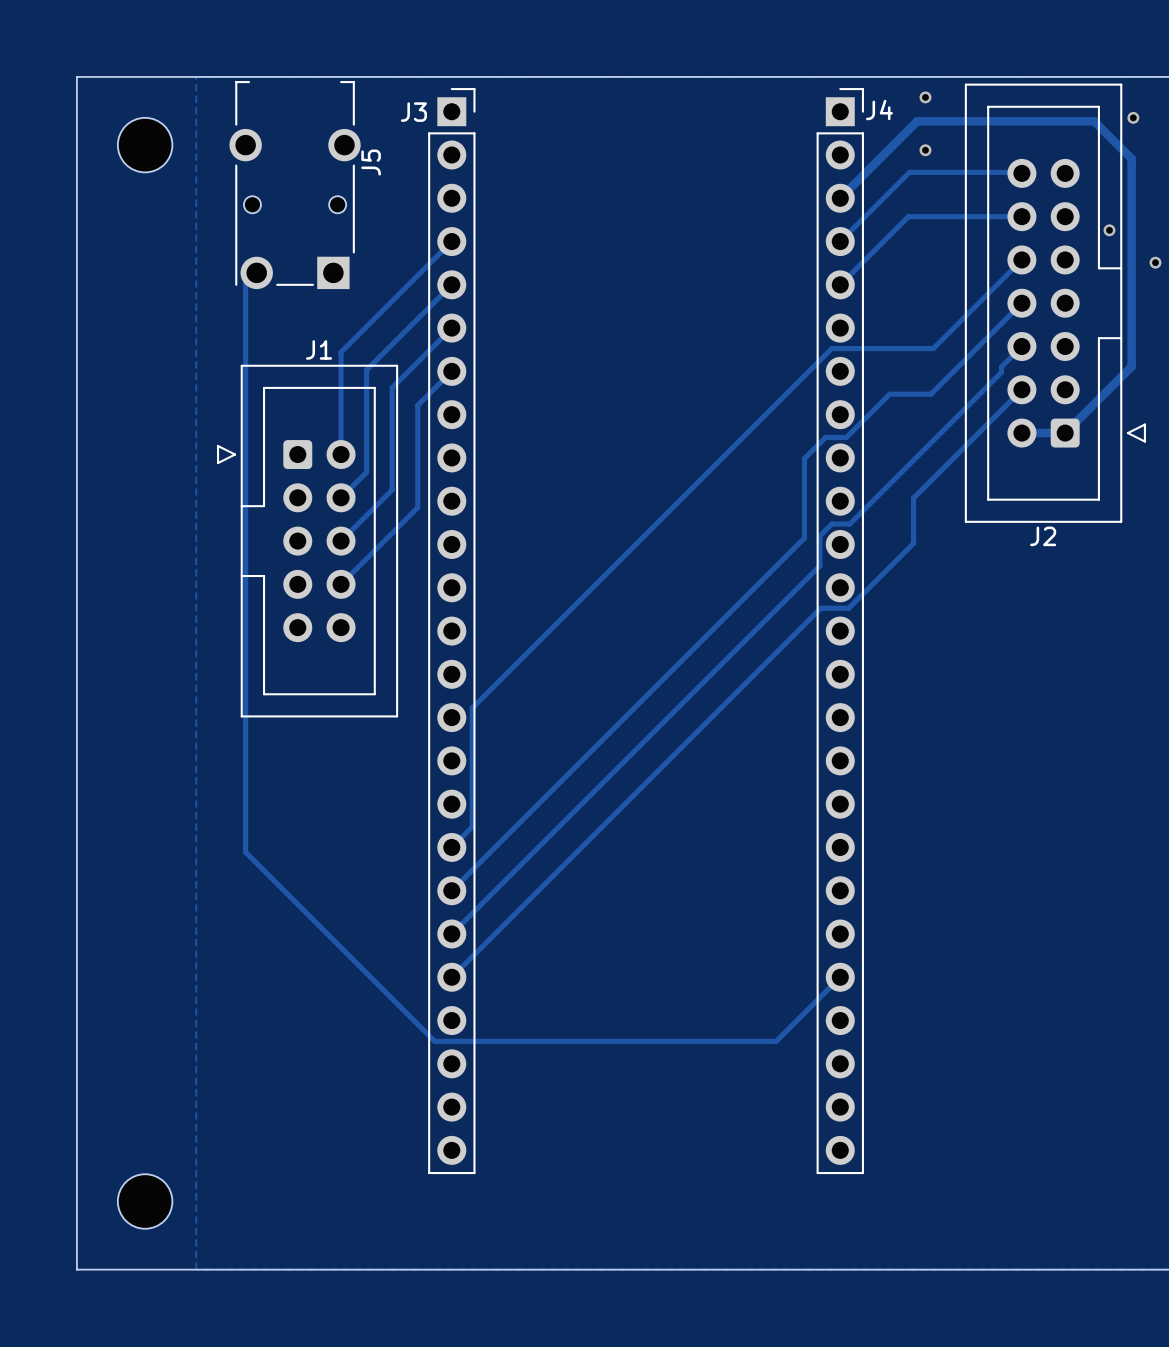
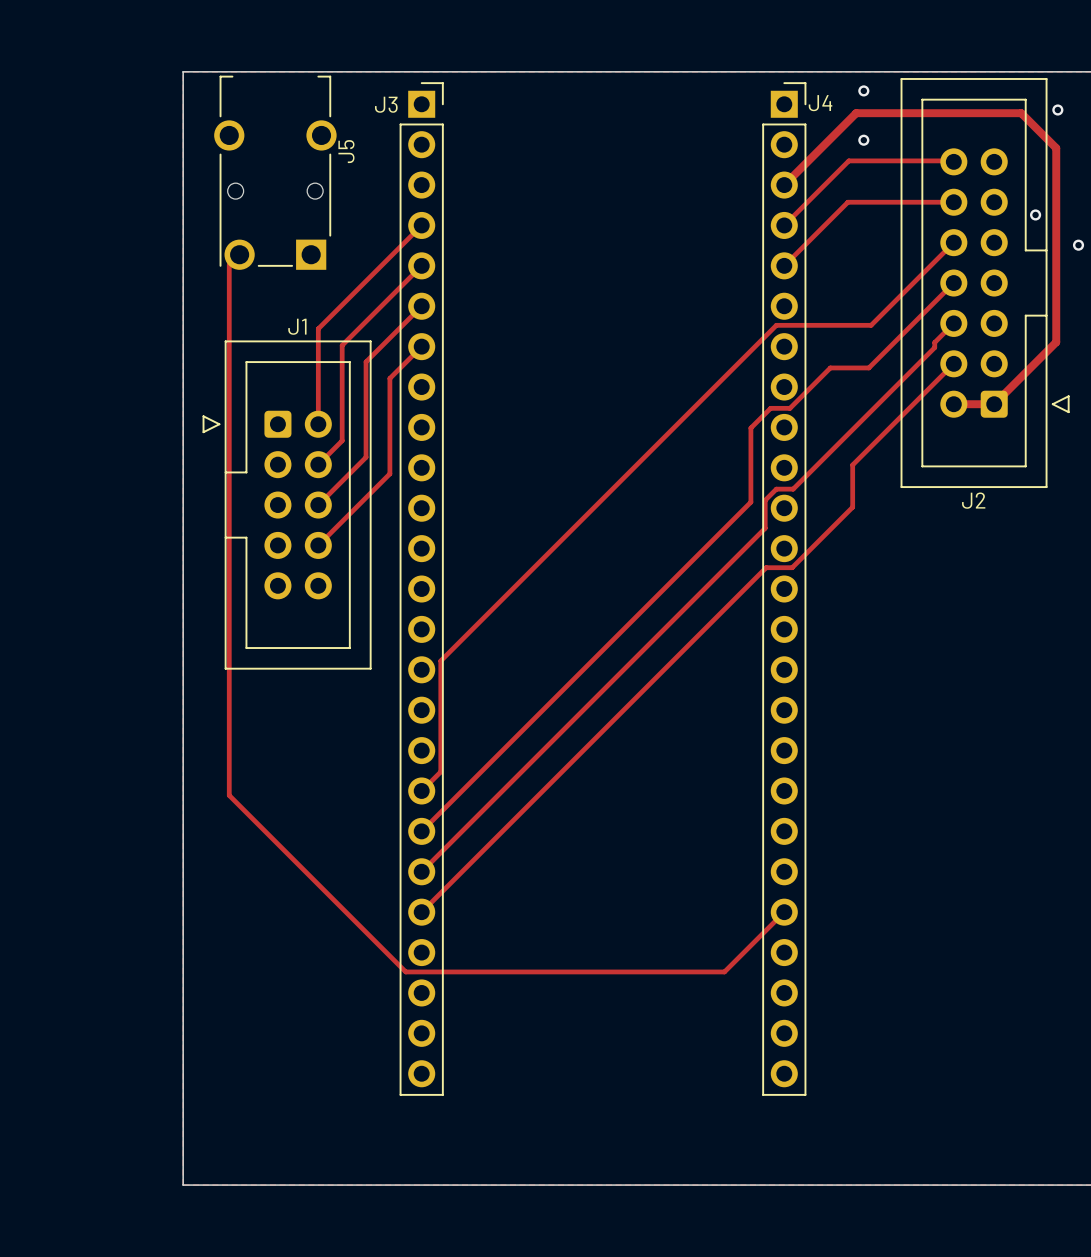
board edge: (196, 76) (76, 76) (76, 1269) (196, 1269) -> (183, 71) (183, 1185)
part: (145, 145) -> none
part: (145, 1201) -> none

